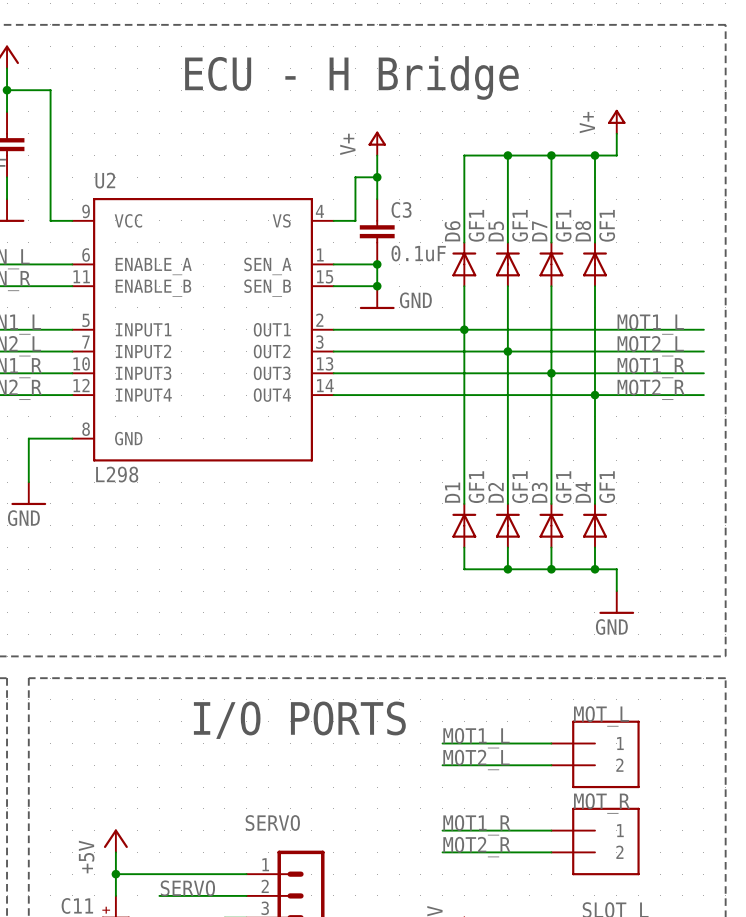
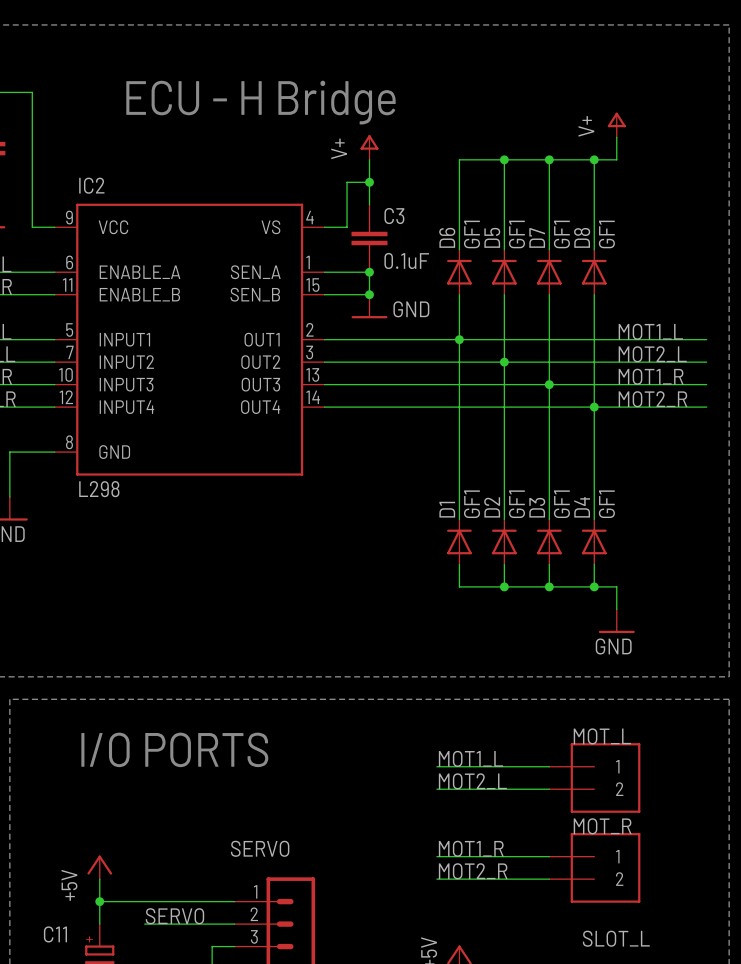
text position: ECU - H Bridge (351, 77) -> ECU - H Bridge (260, 102)
U2 name: U2 (105, 180) -> IC2 (91, 185)
text position: I/O PORTS (299, 720) -> I/O PORTS (174, 749)

